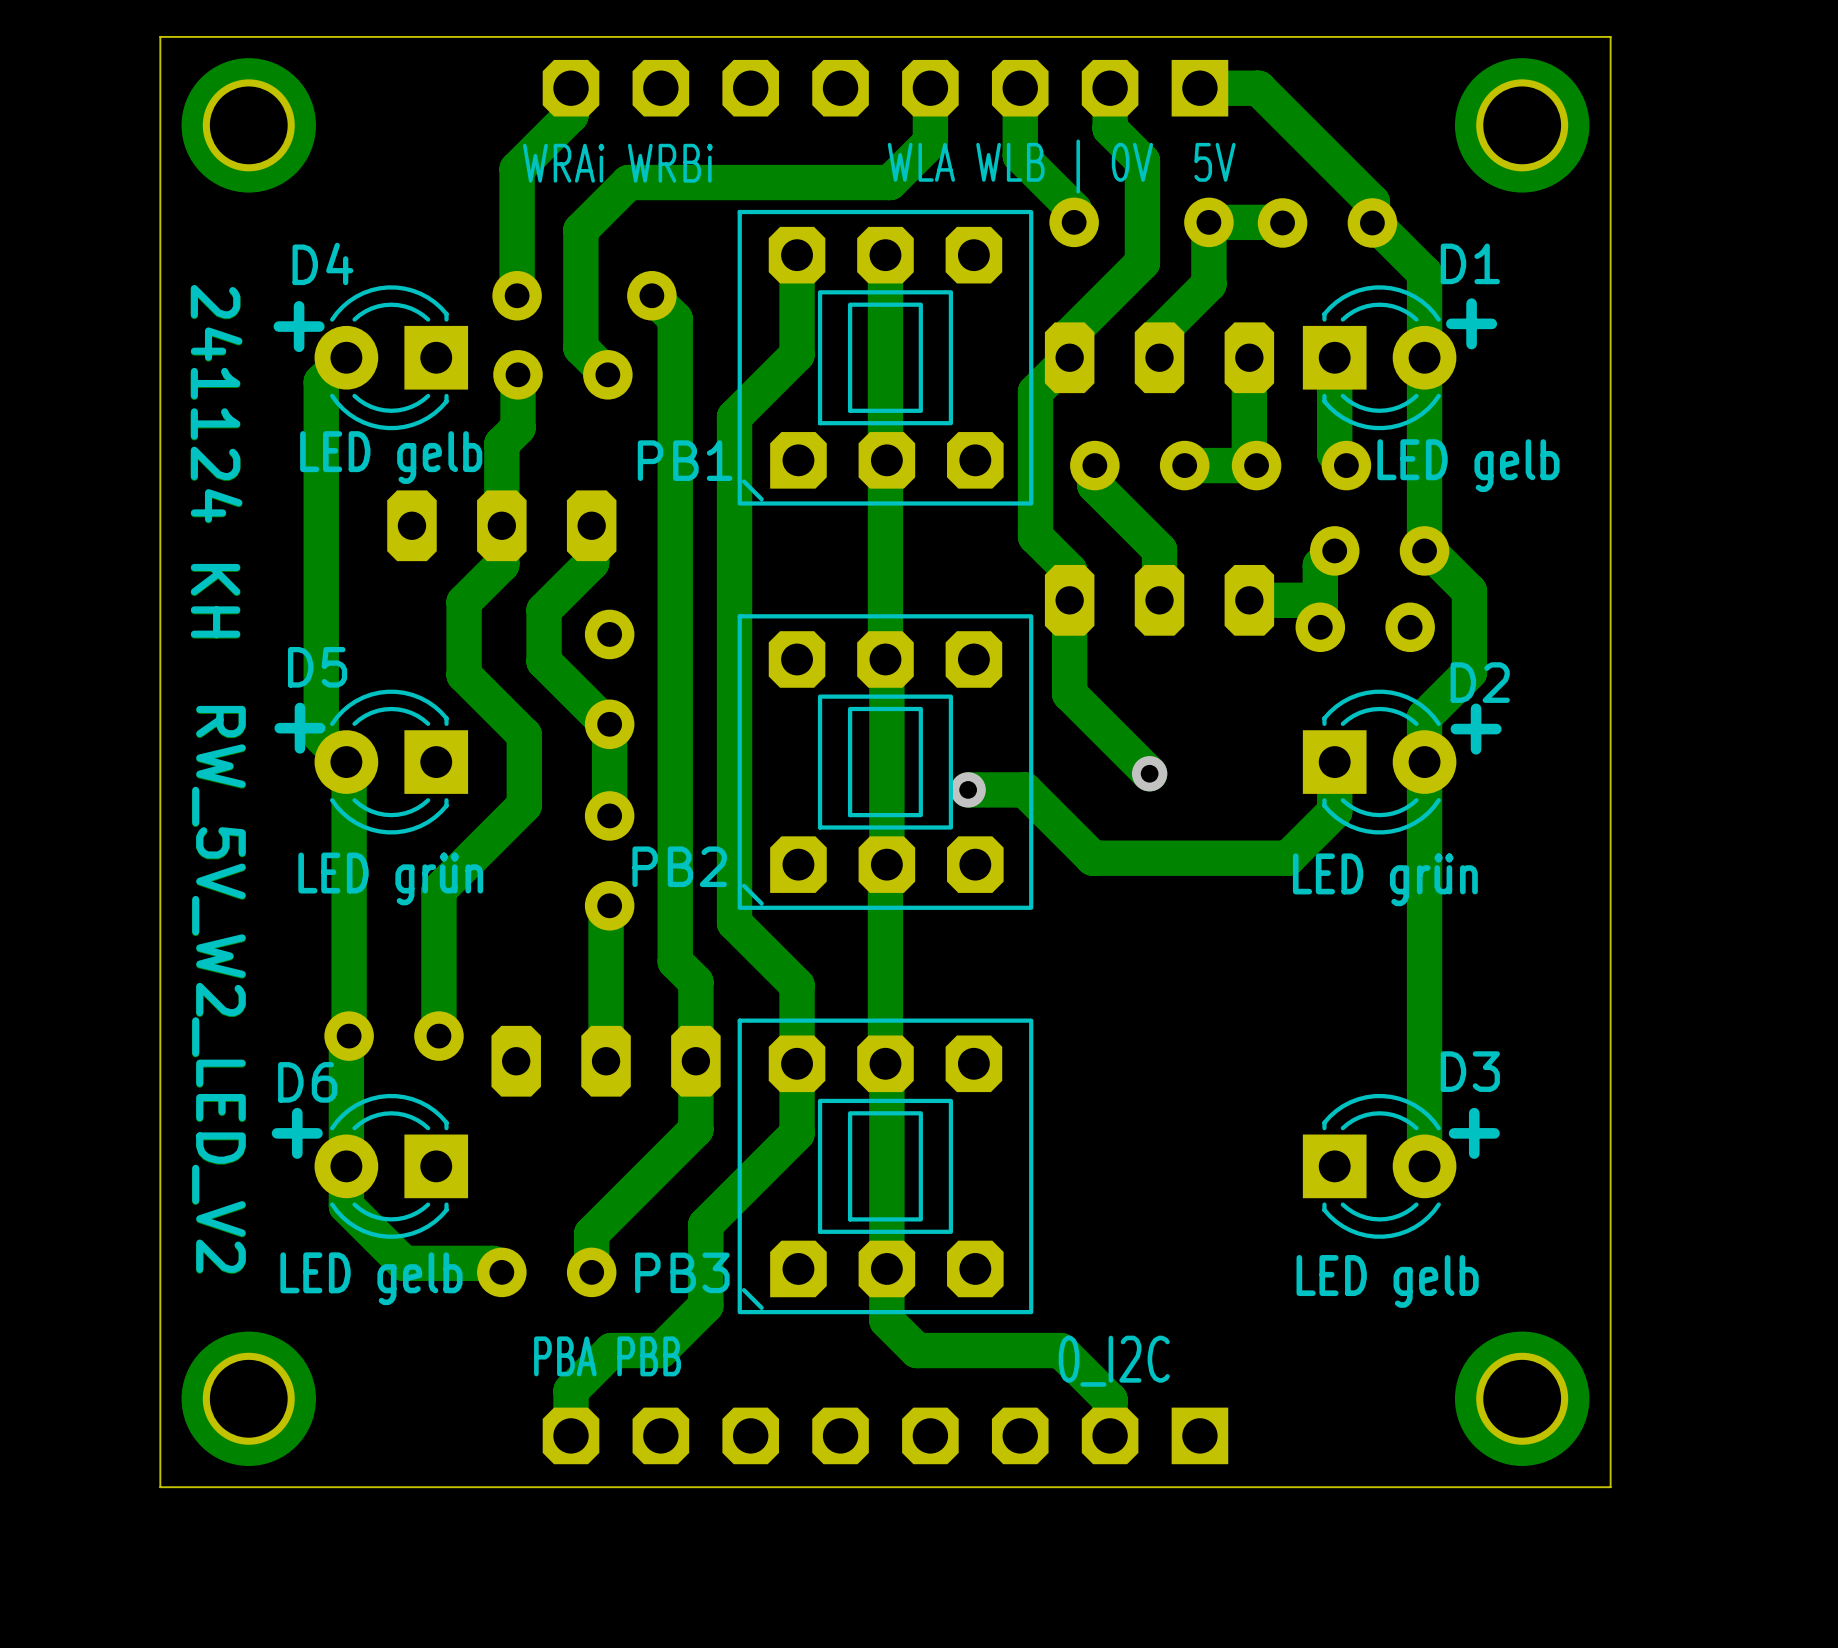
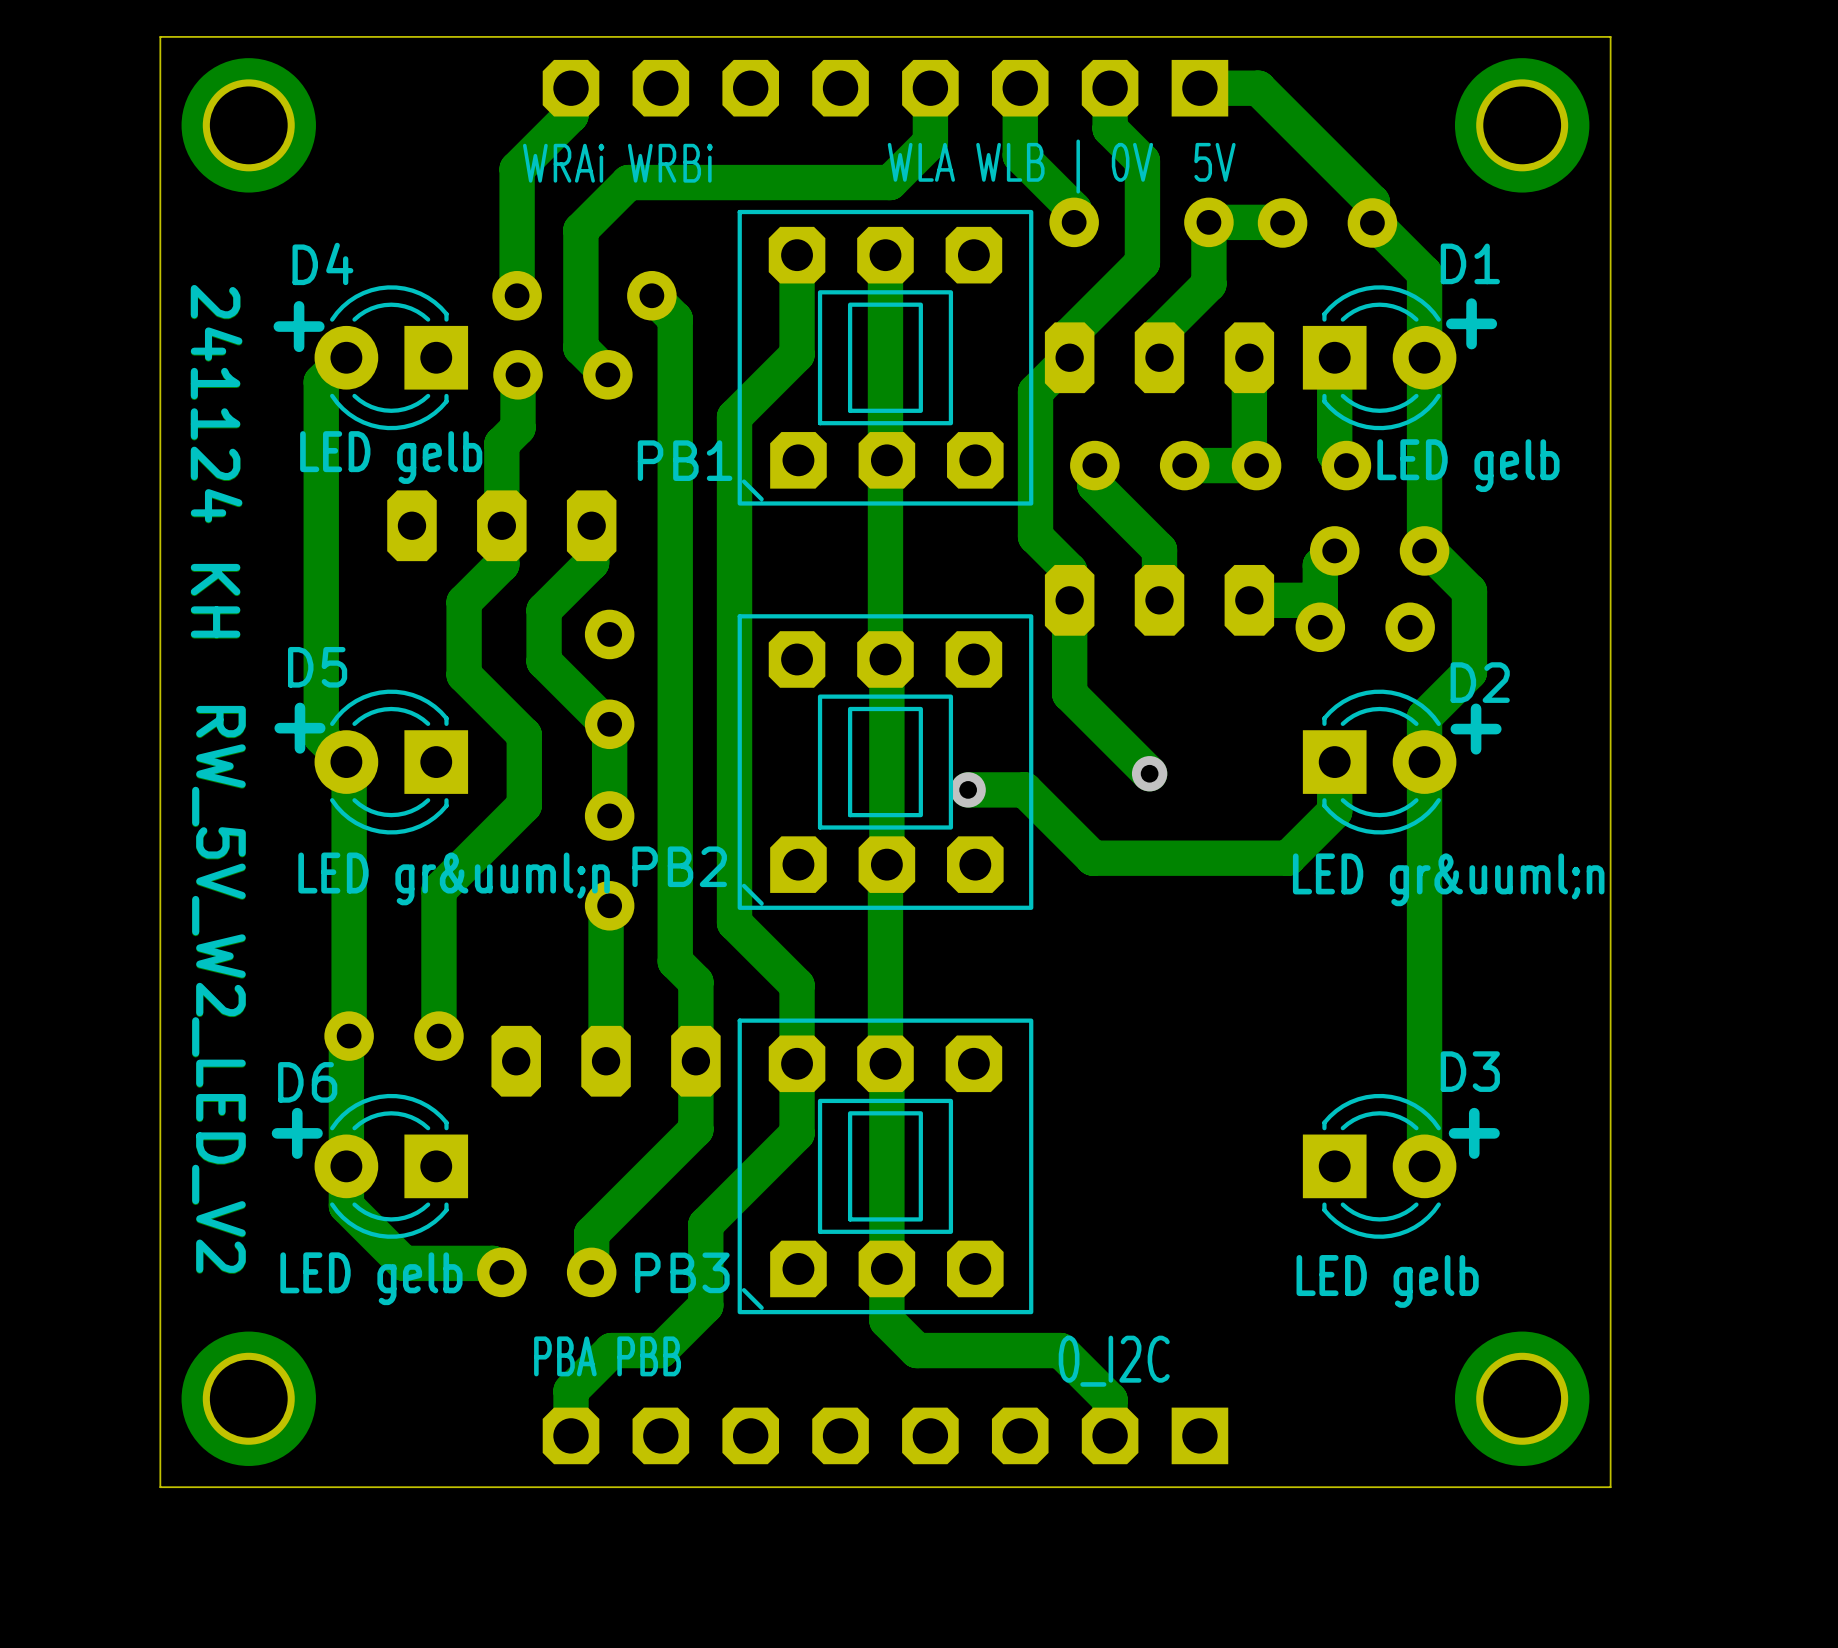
text: LED grün (390, 878) -> LED gr&uuml;n (454, 878)
text: LED grün (1385, 879) -> LED gr&uuml;n (1448, 879)

